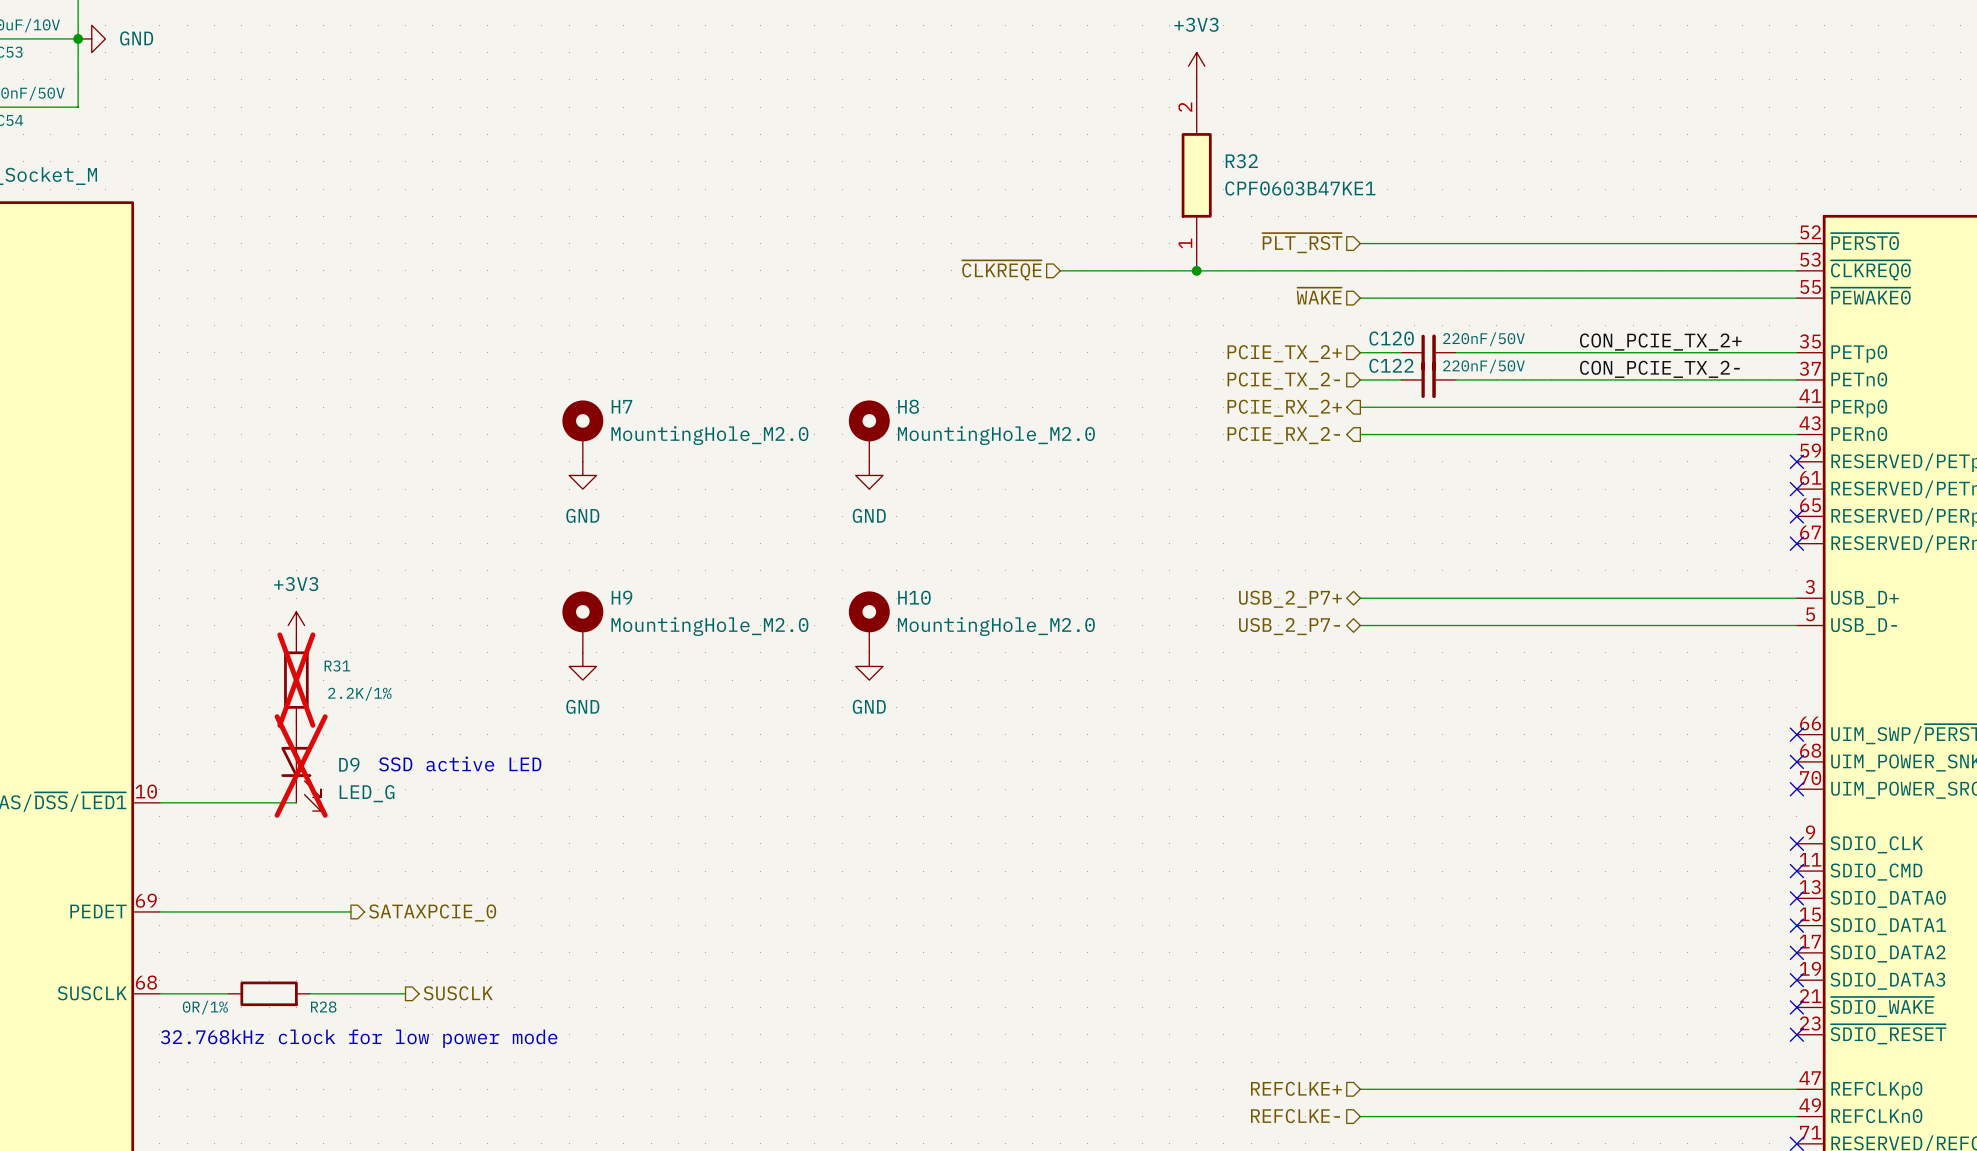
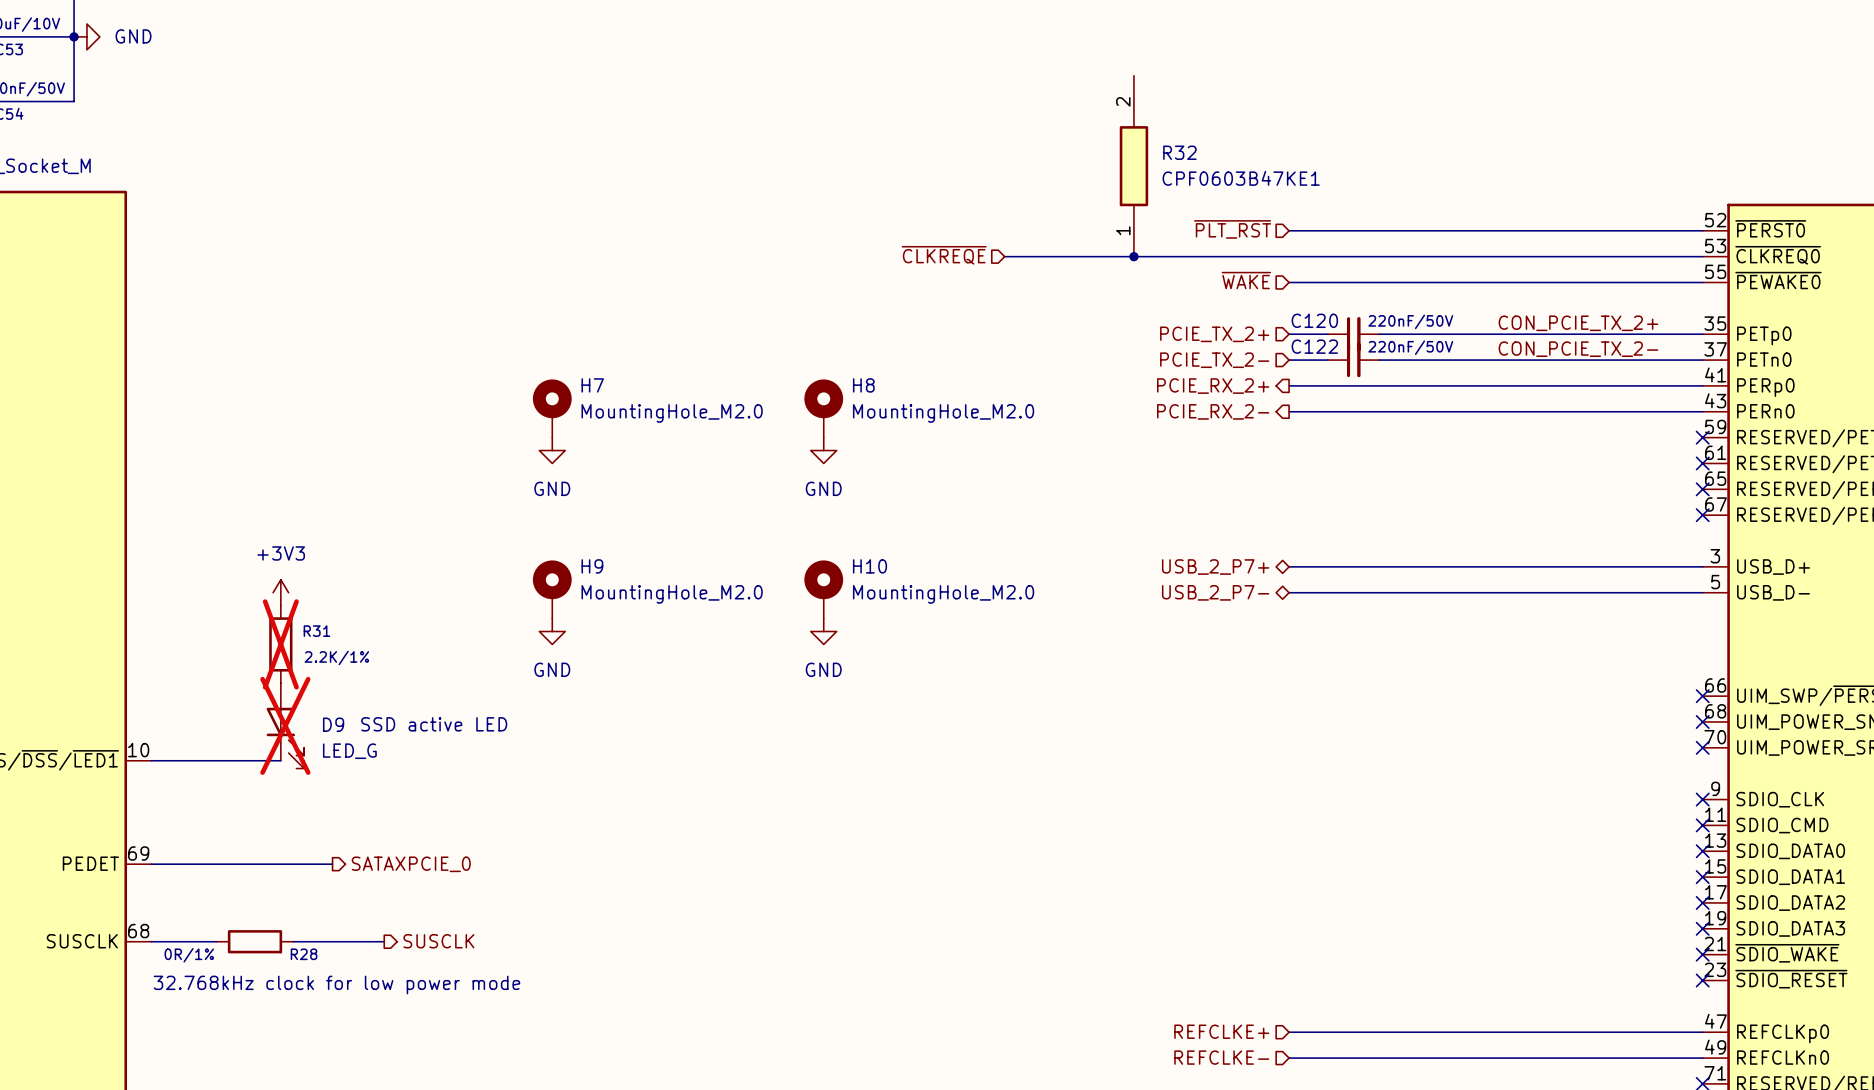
power symbol: +3V3 (1196, 66) -> none

